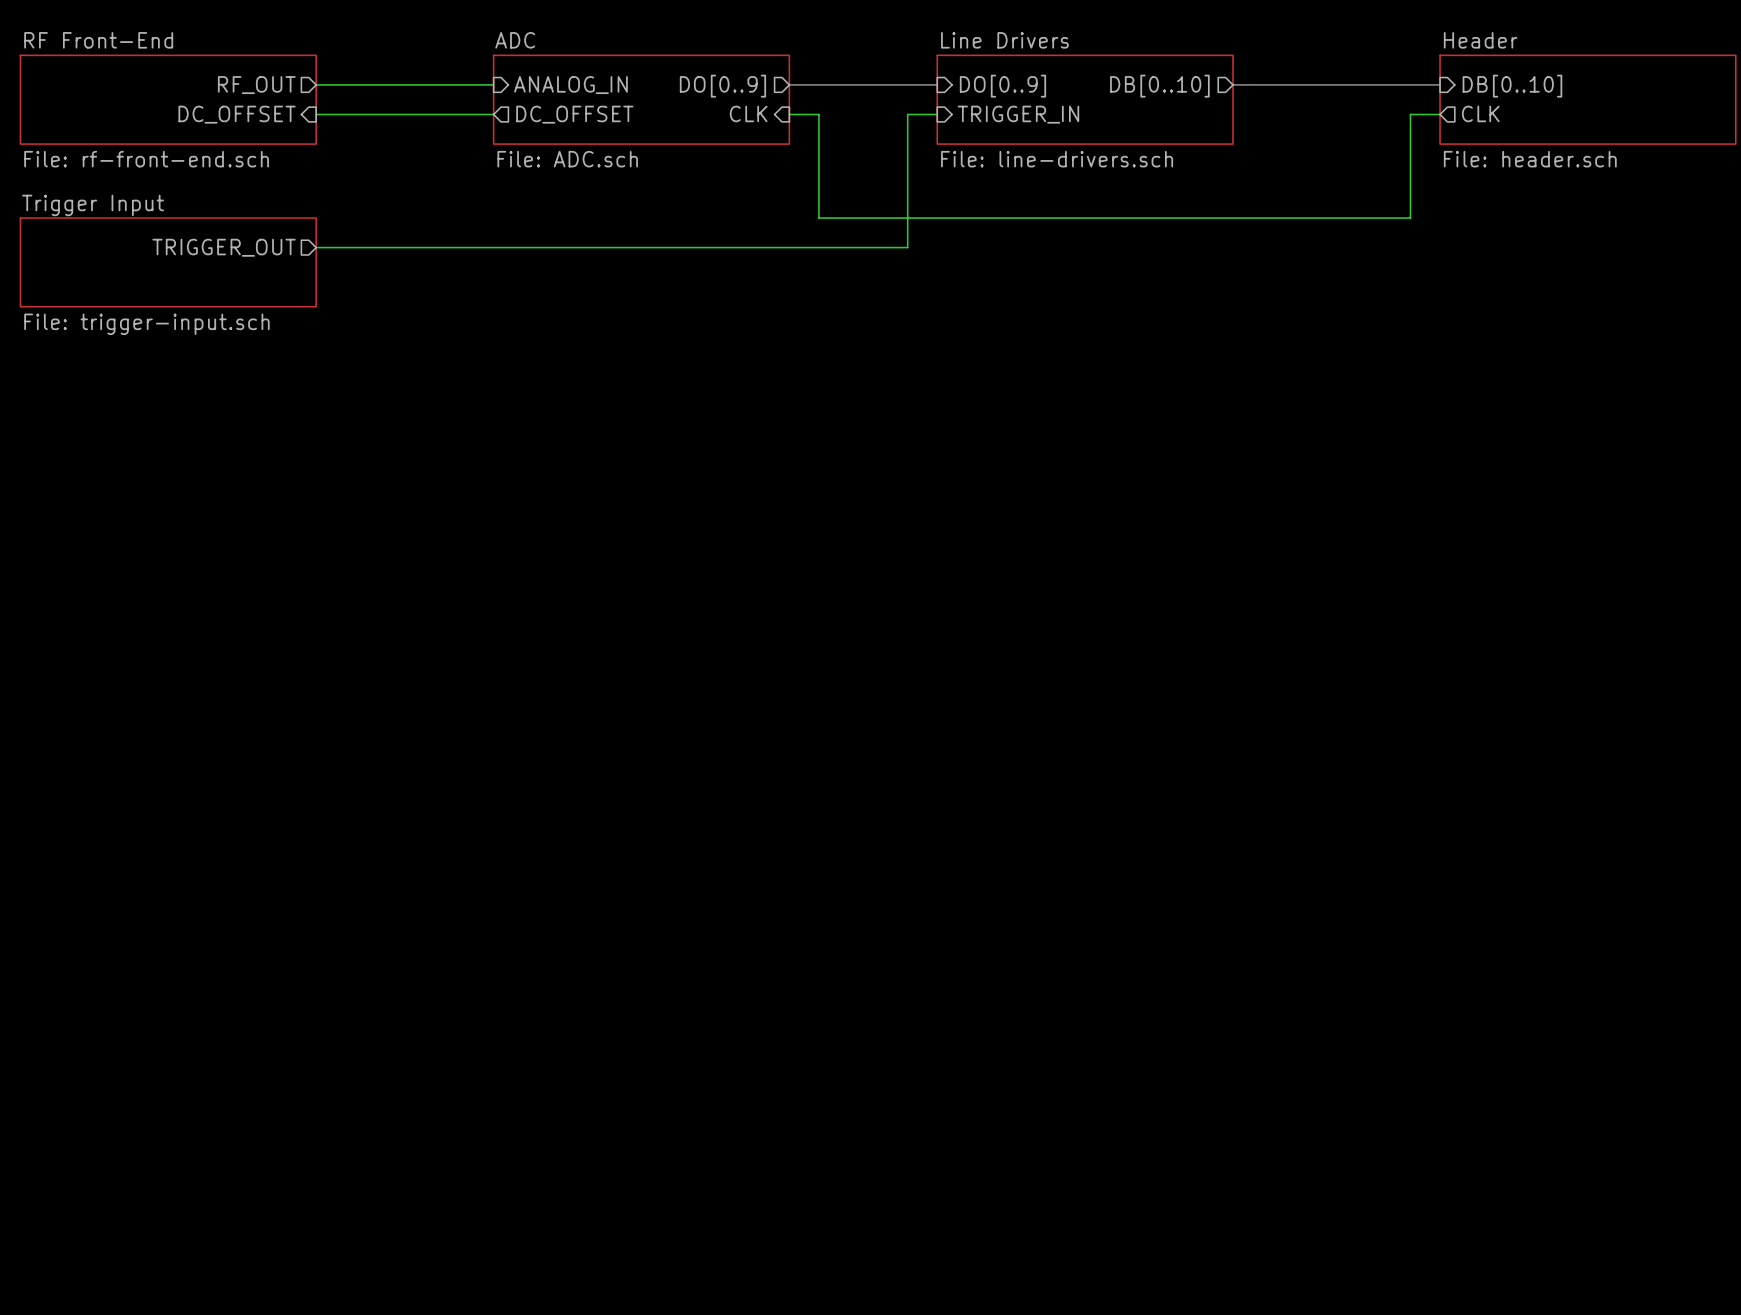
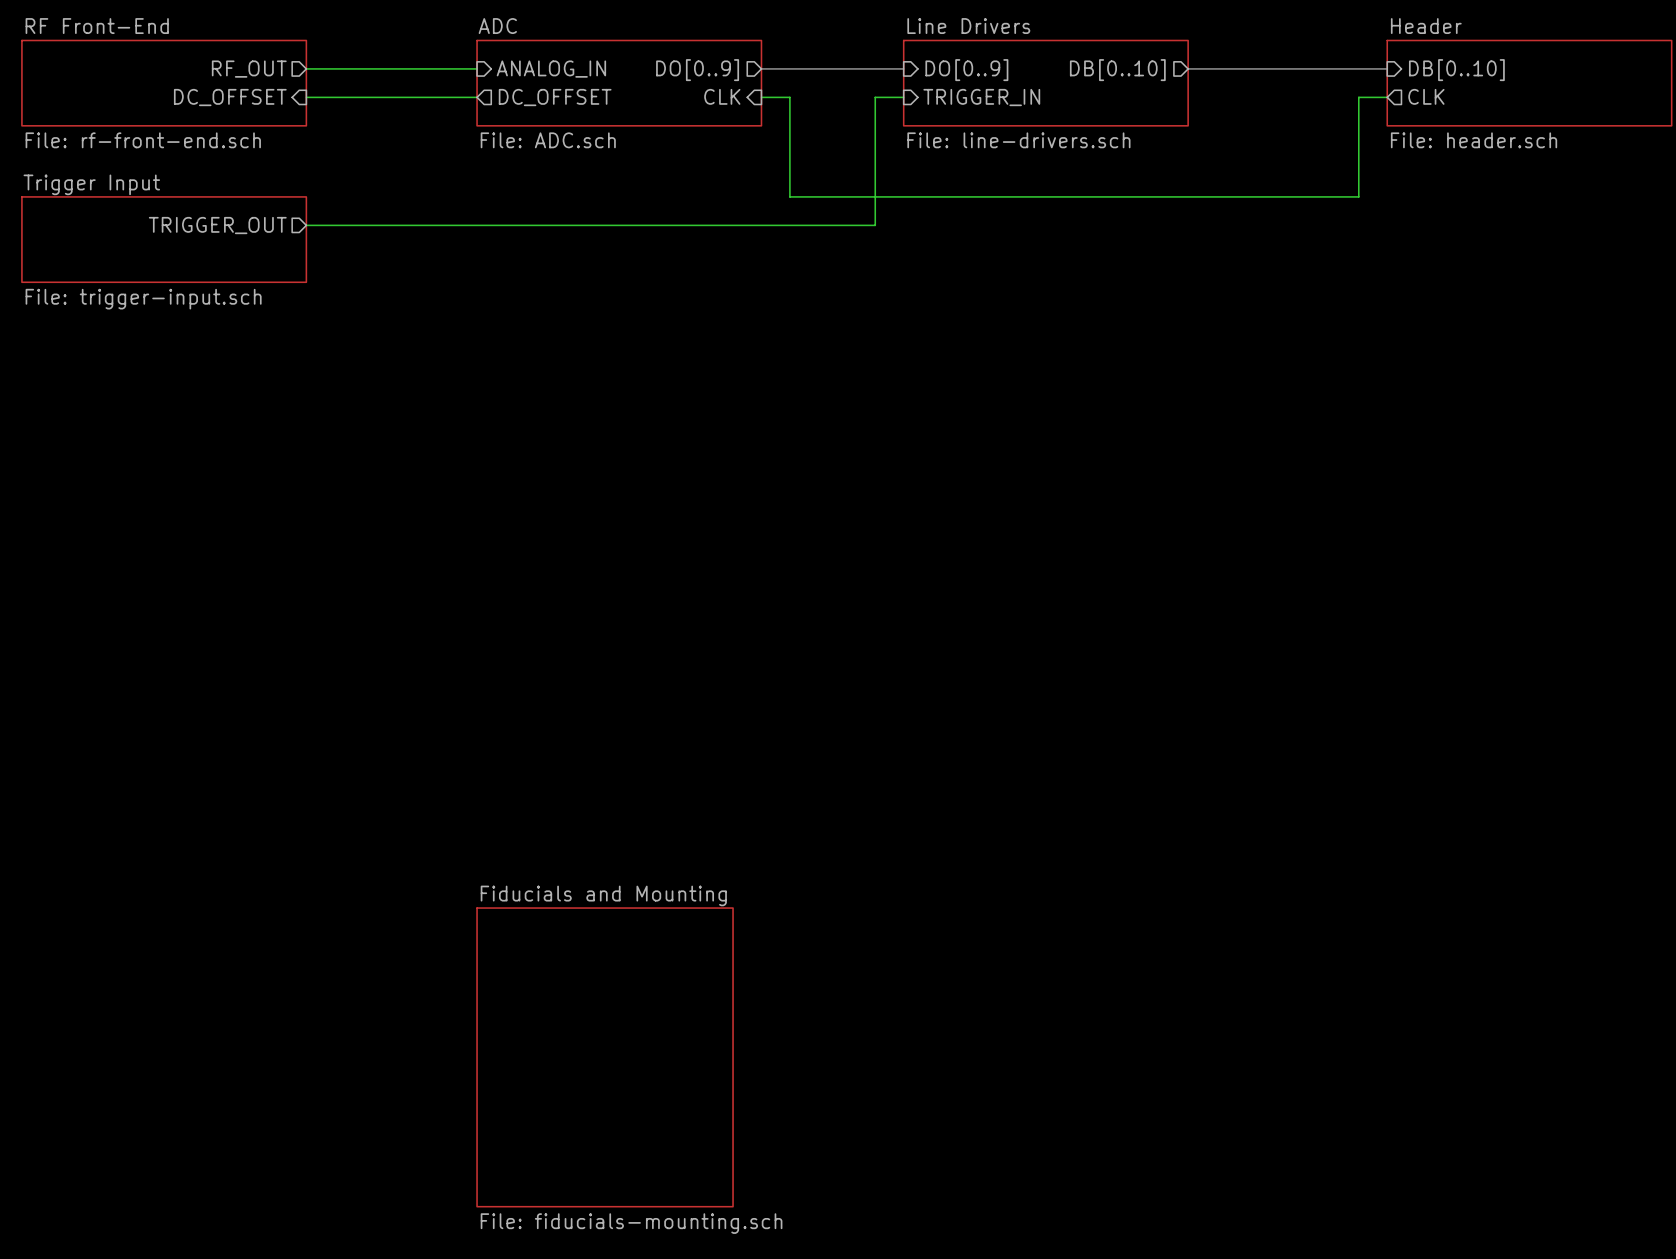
sheet Fiducials and Mounting: none -> File: fiducials-mounting.sch (605, 1057)

